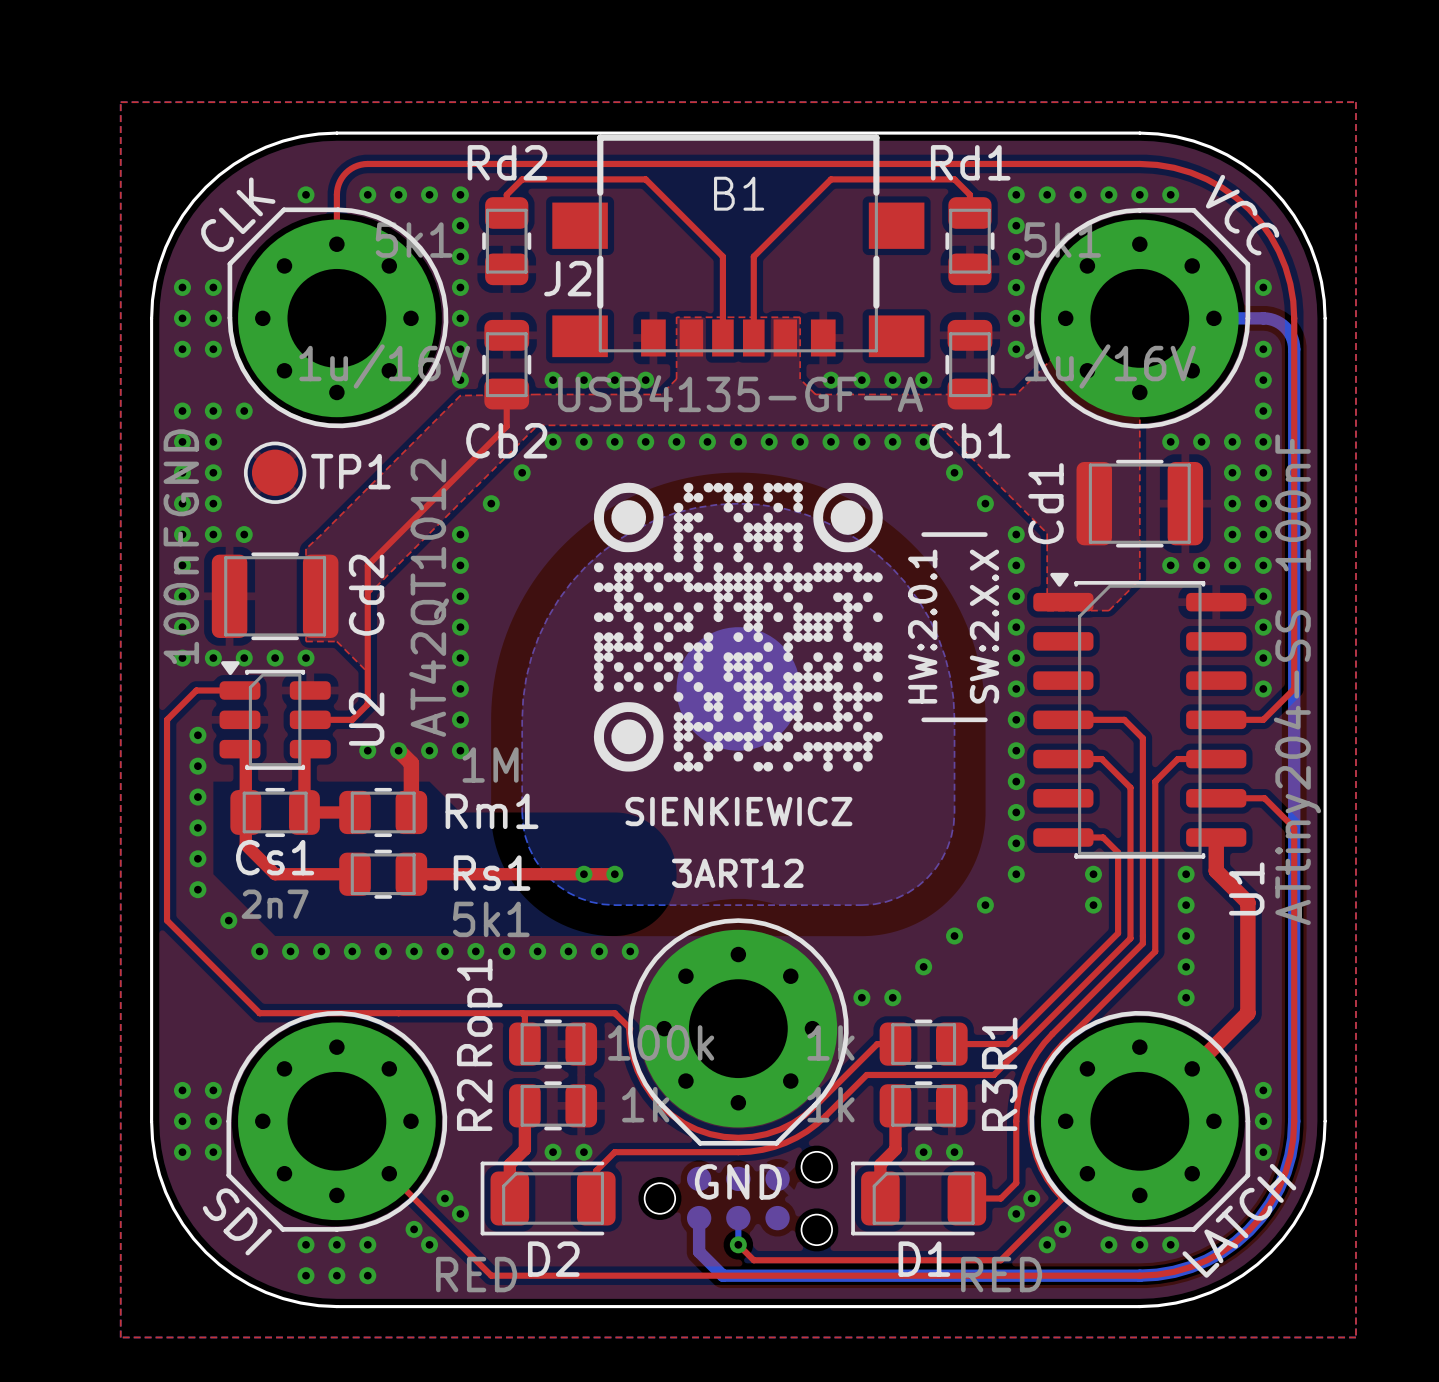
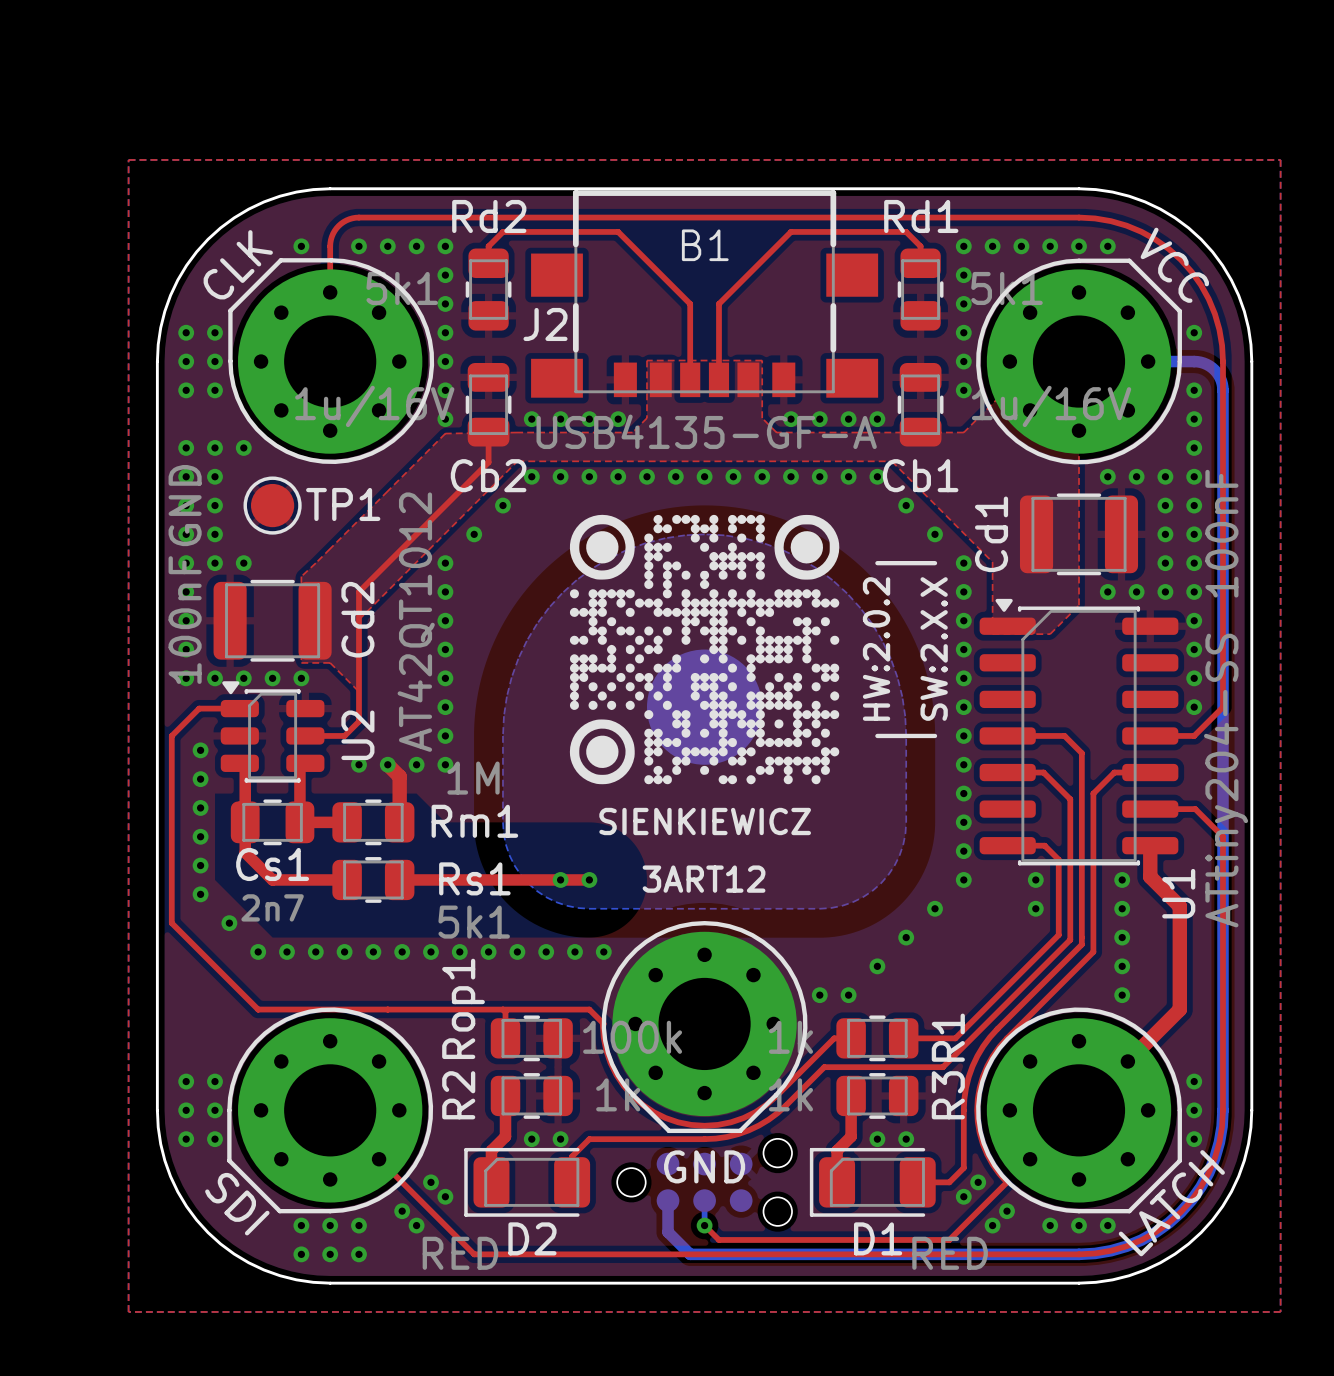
text: HW:2.0.1 (922, 626) -> HW:2.0.2 (876, 649)

